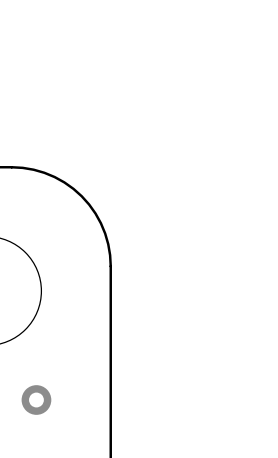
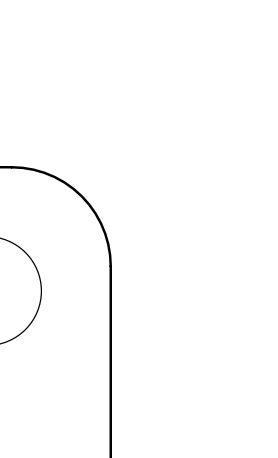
via: (36, 400) -> none

